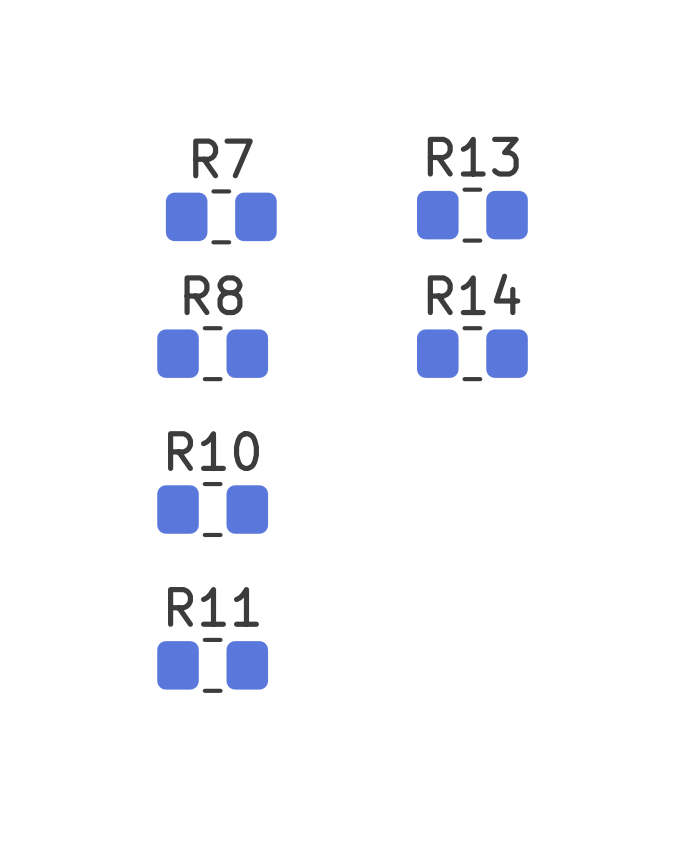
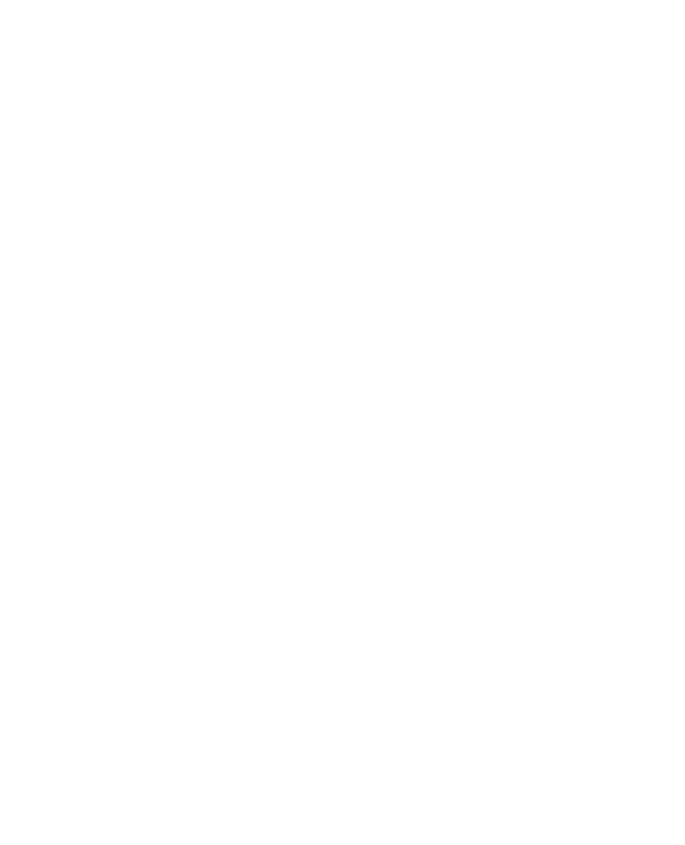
R13: (472, 215) -> none
R7: (221, 216) -> none
R8: (212, 353) -> none
R14: (472, 353) -> none
R10: (212, 509) -> none
R11: (212, 665) -> none

